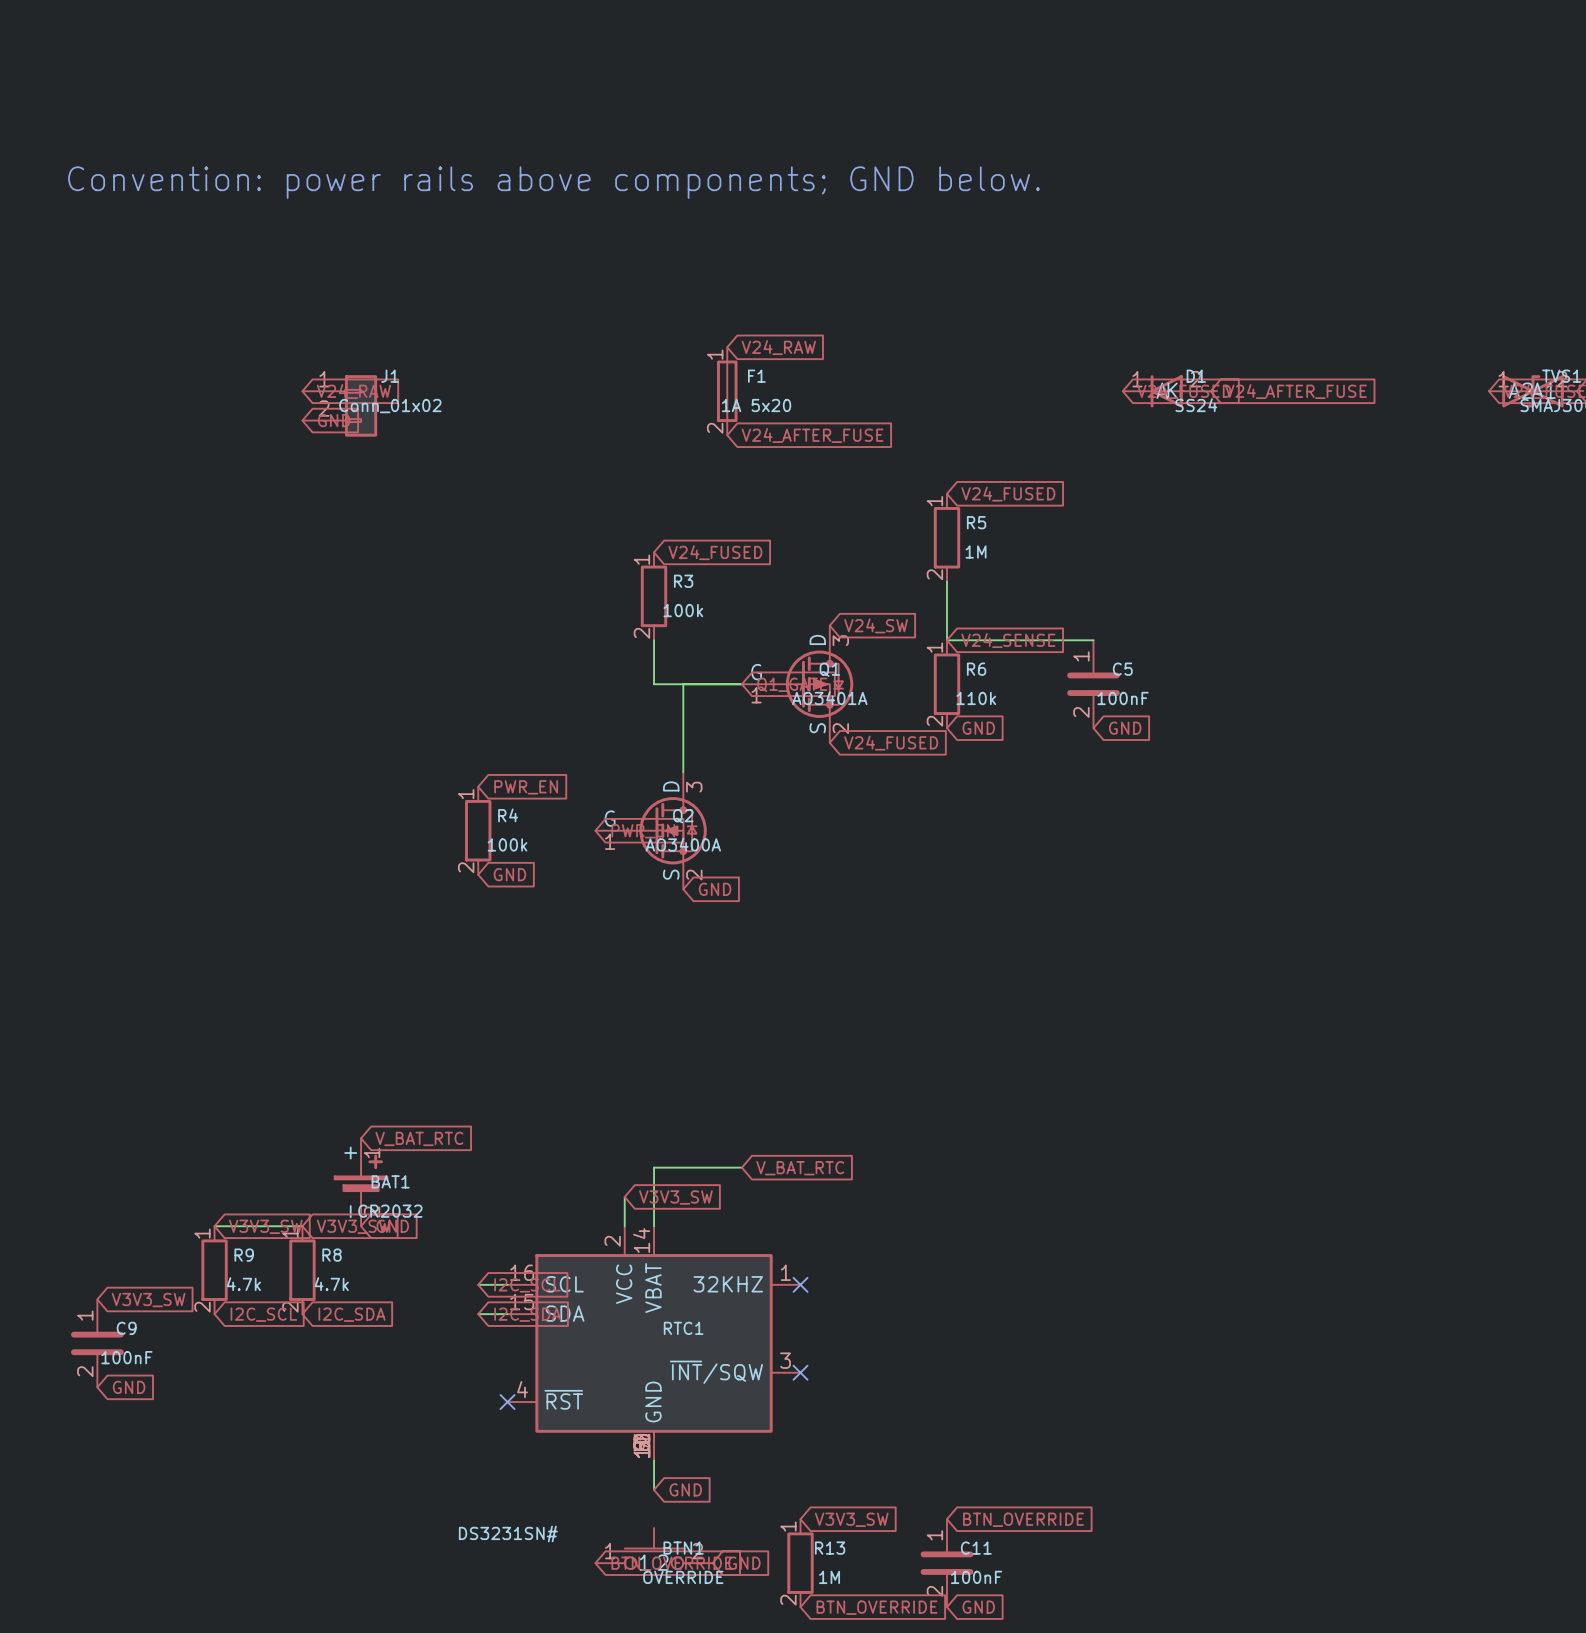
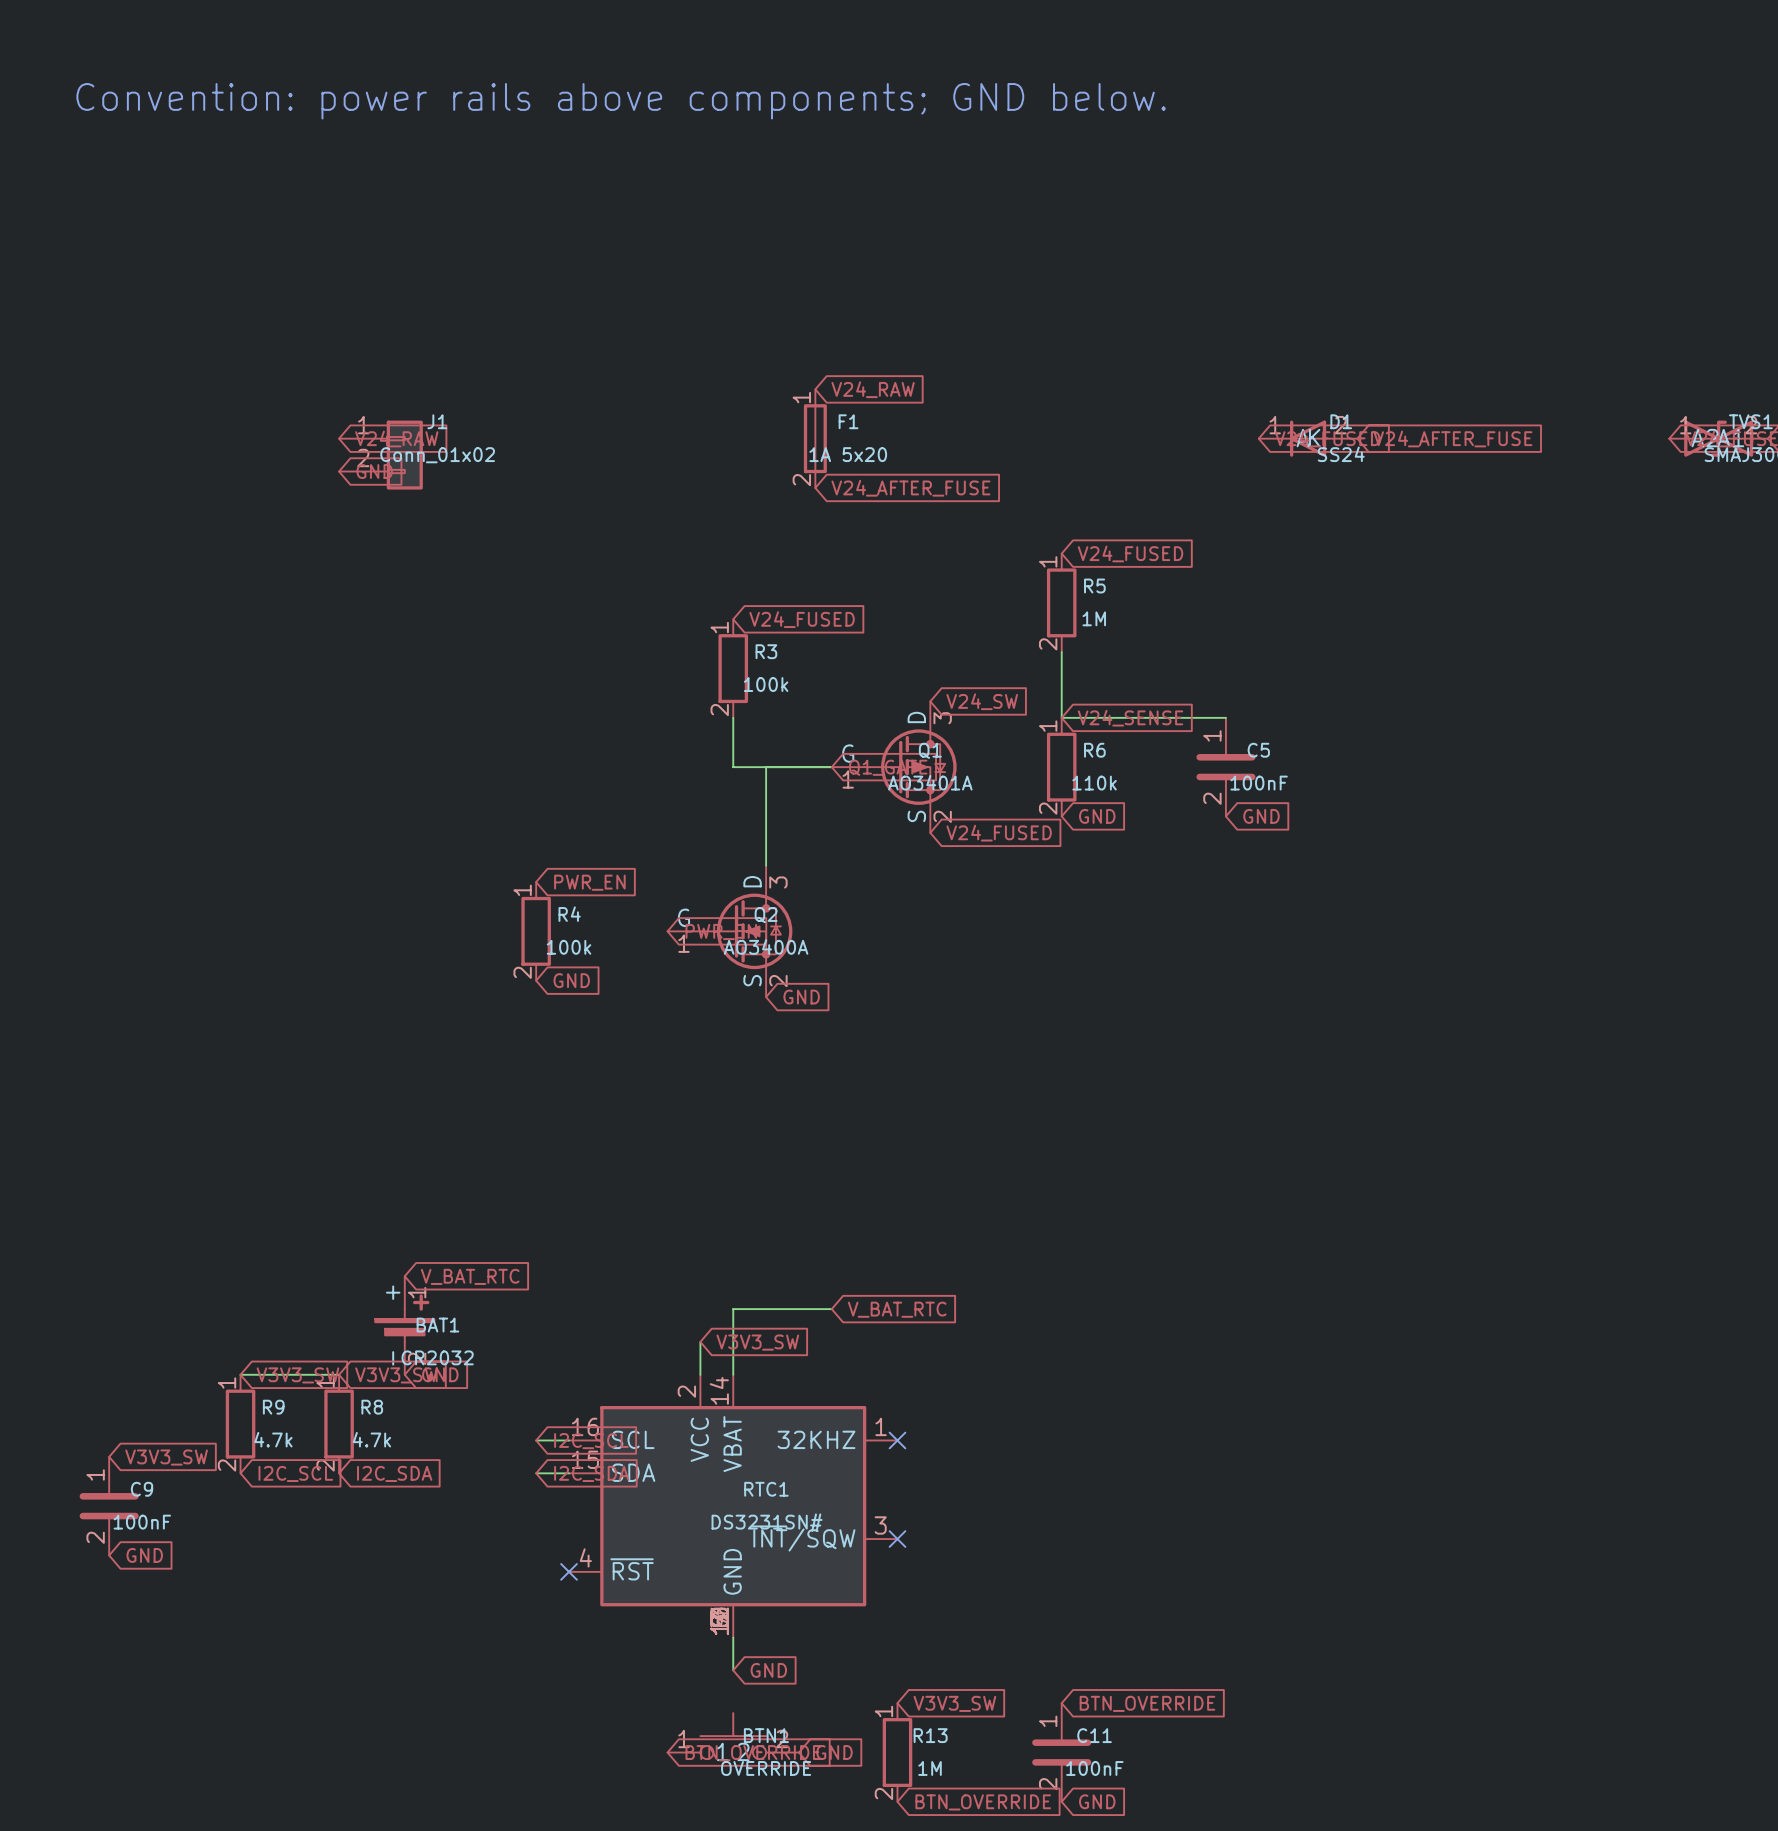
text position: Convention: power rails above components; GND below. (554, 182) -> Convention: power rails above components; GND below. (621, 101)
RTC1 value position: DS3231SN# (508, 1533) -> DS3231SN# (767, 1522)

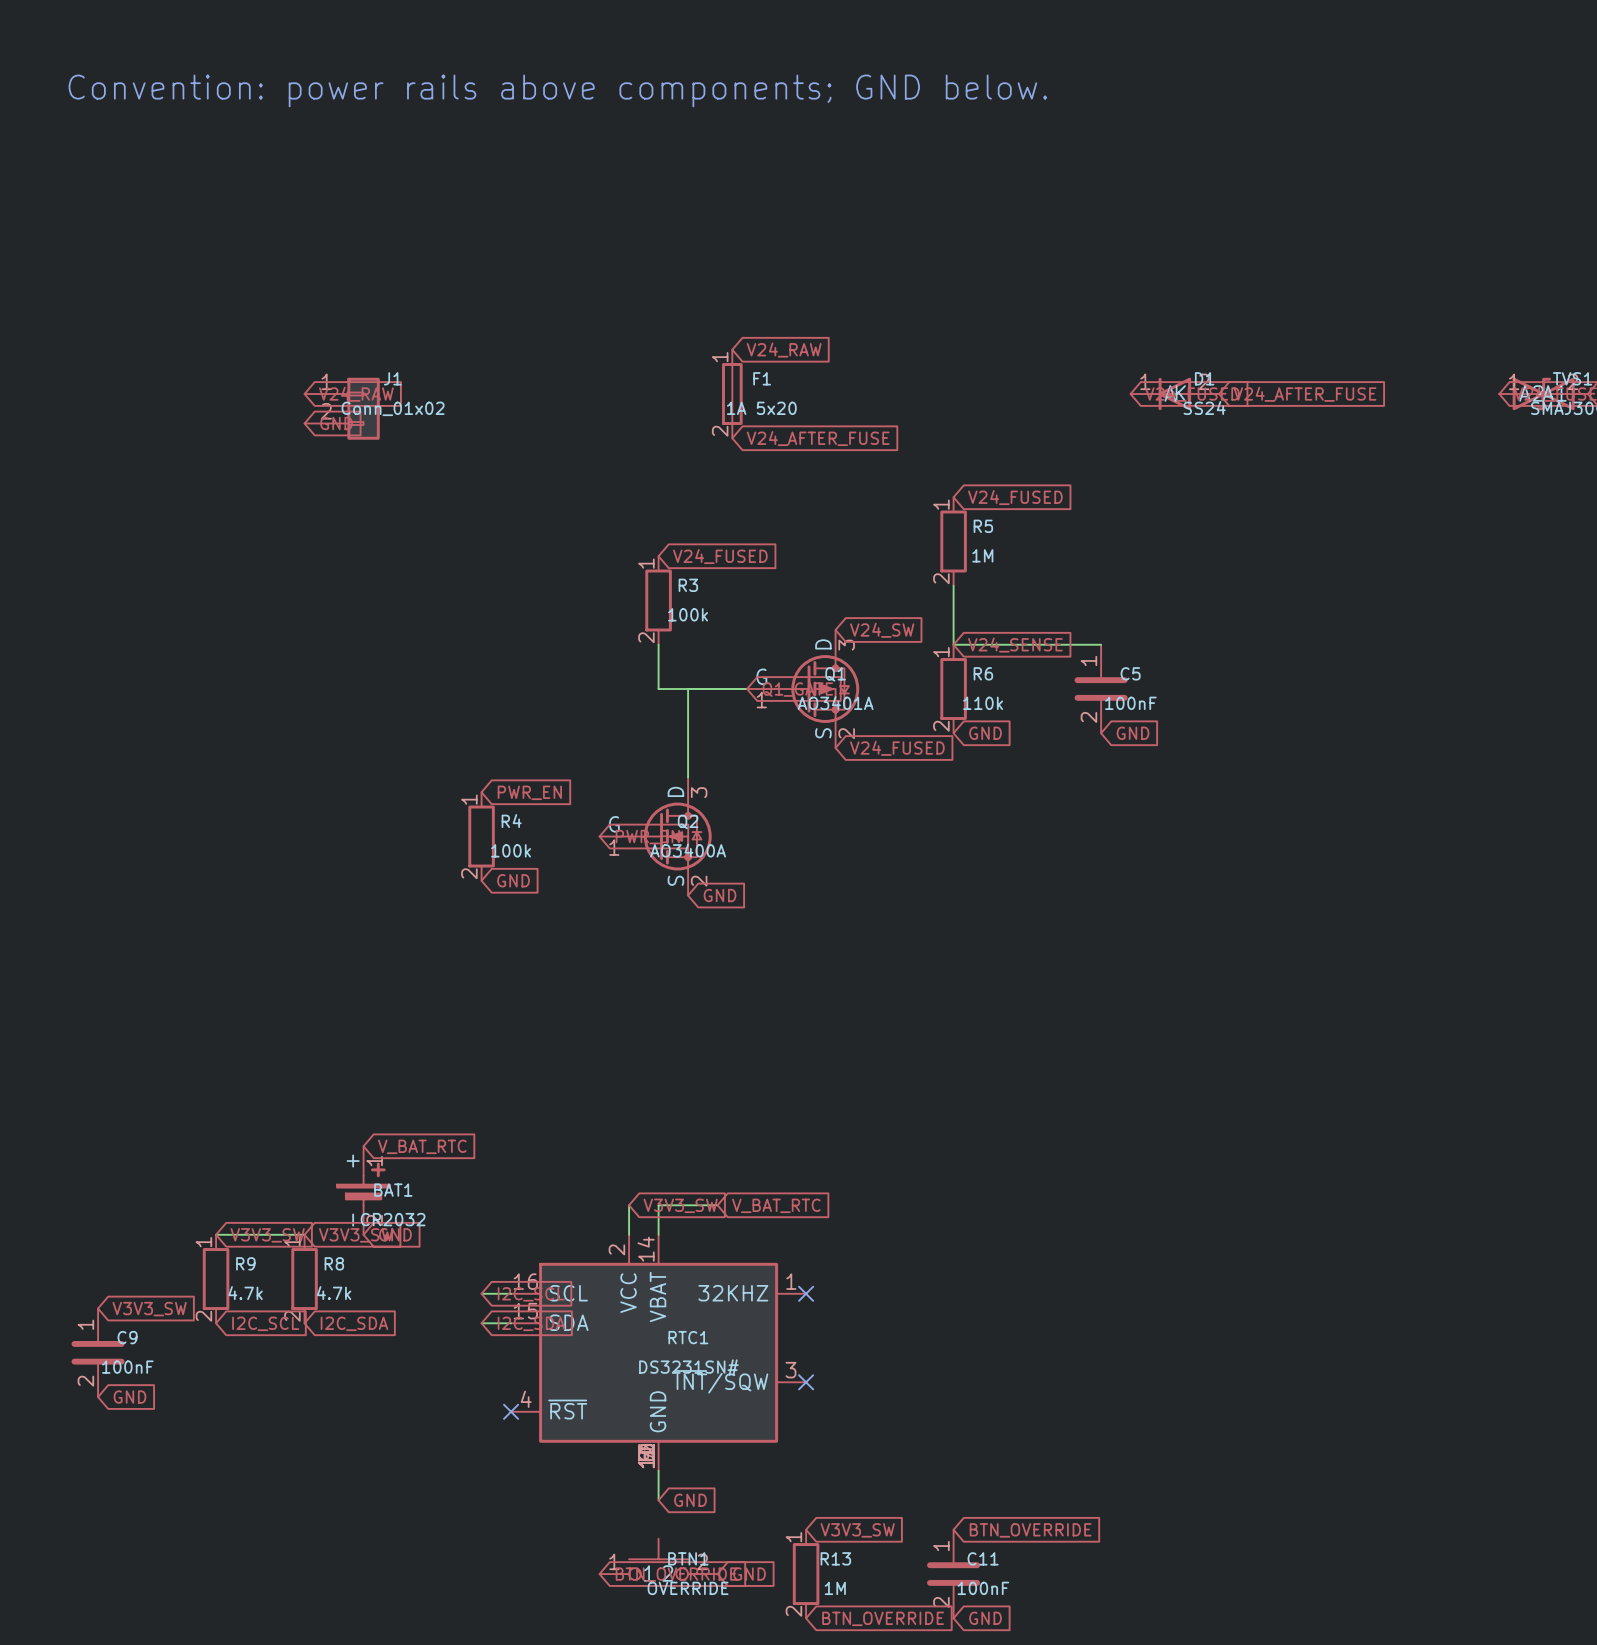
wire: (831, 1309) (733, 1309) (733, 1341) -> (717, 1205) (658, 1205)
global label position: V_BAT_RTC (897, 1309) -> V_BAT_RTC (776, 1205)

